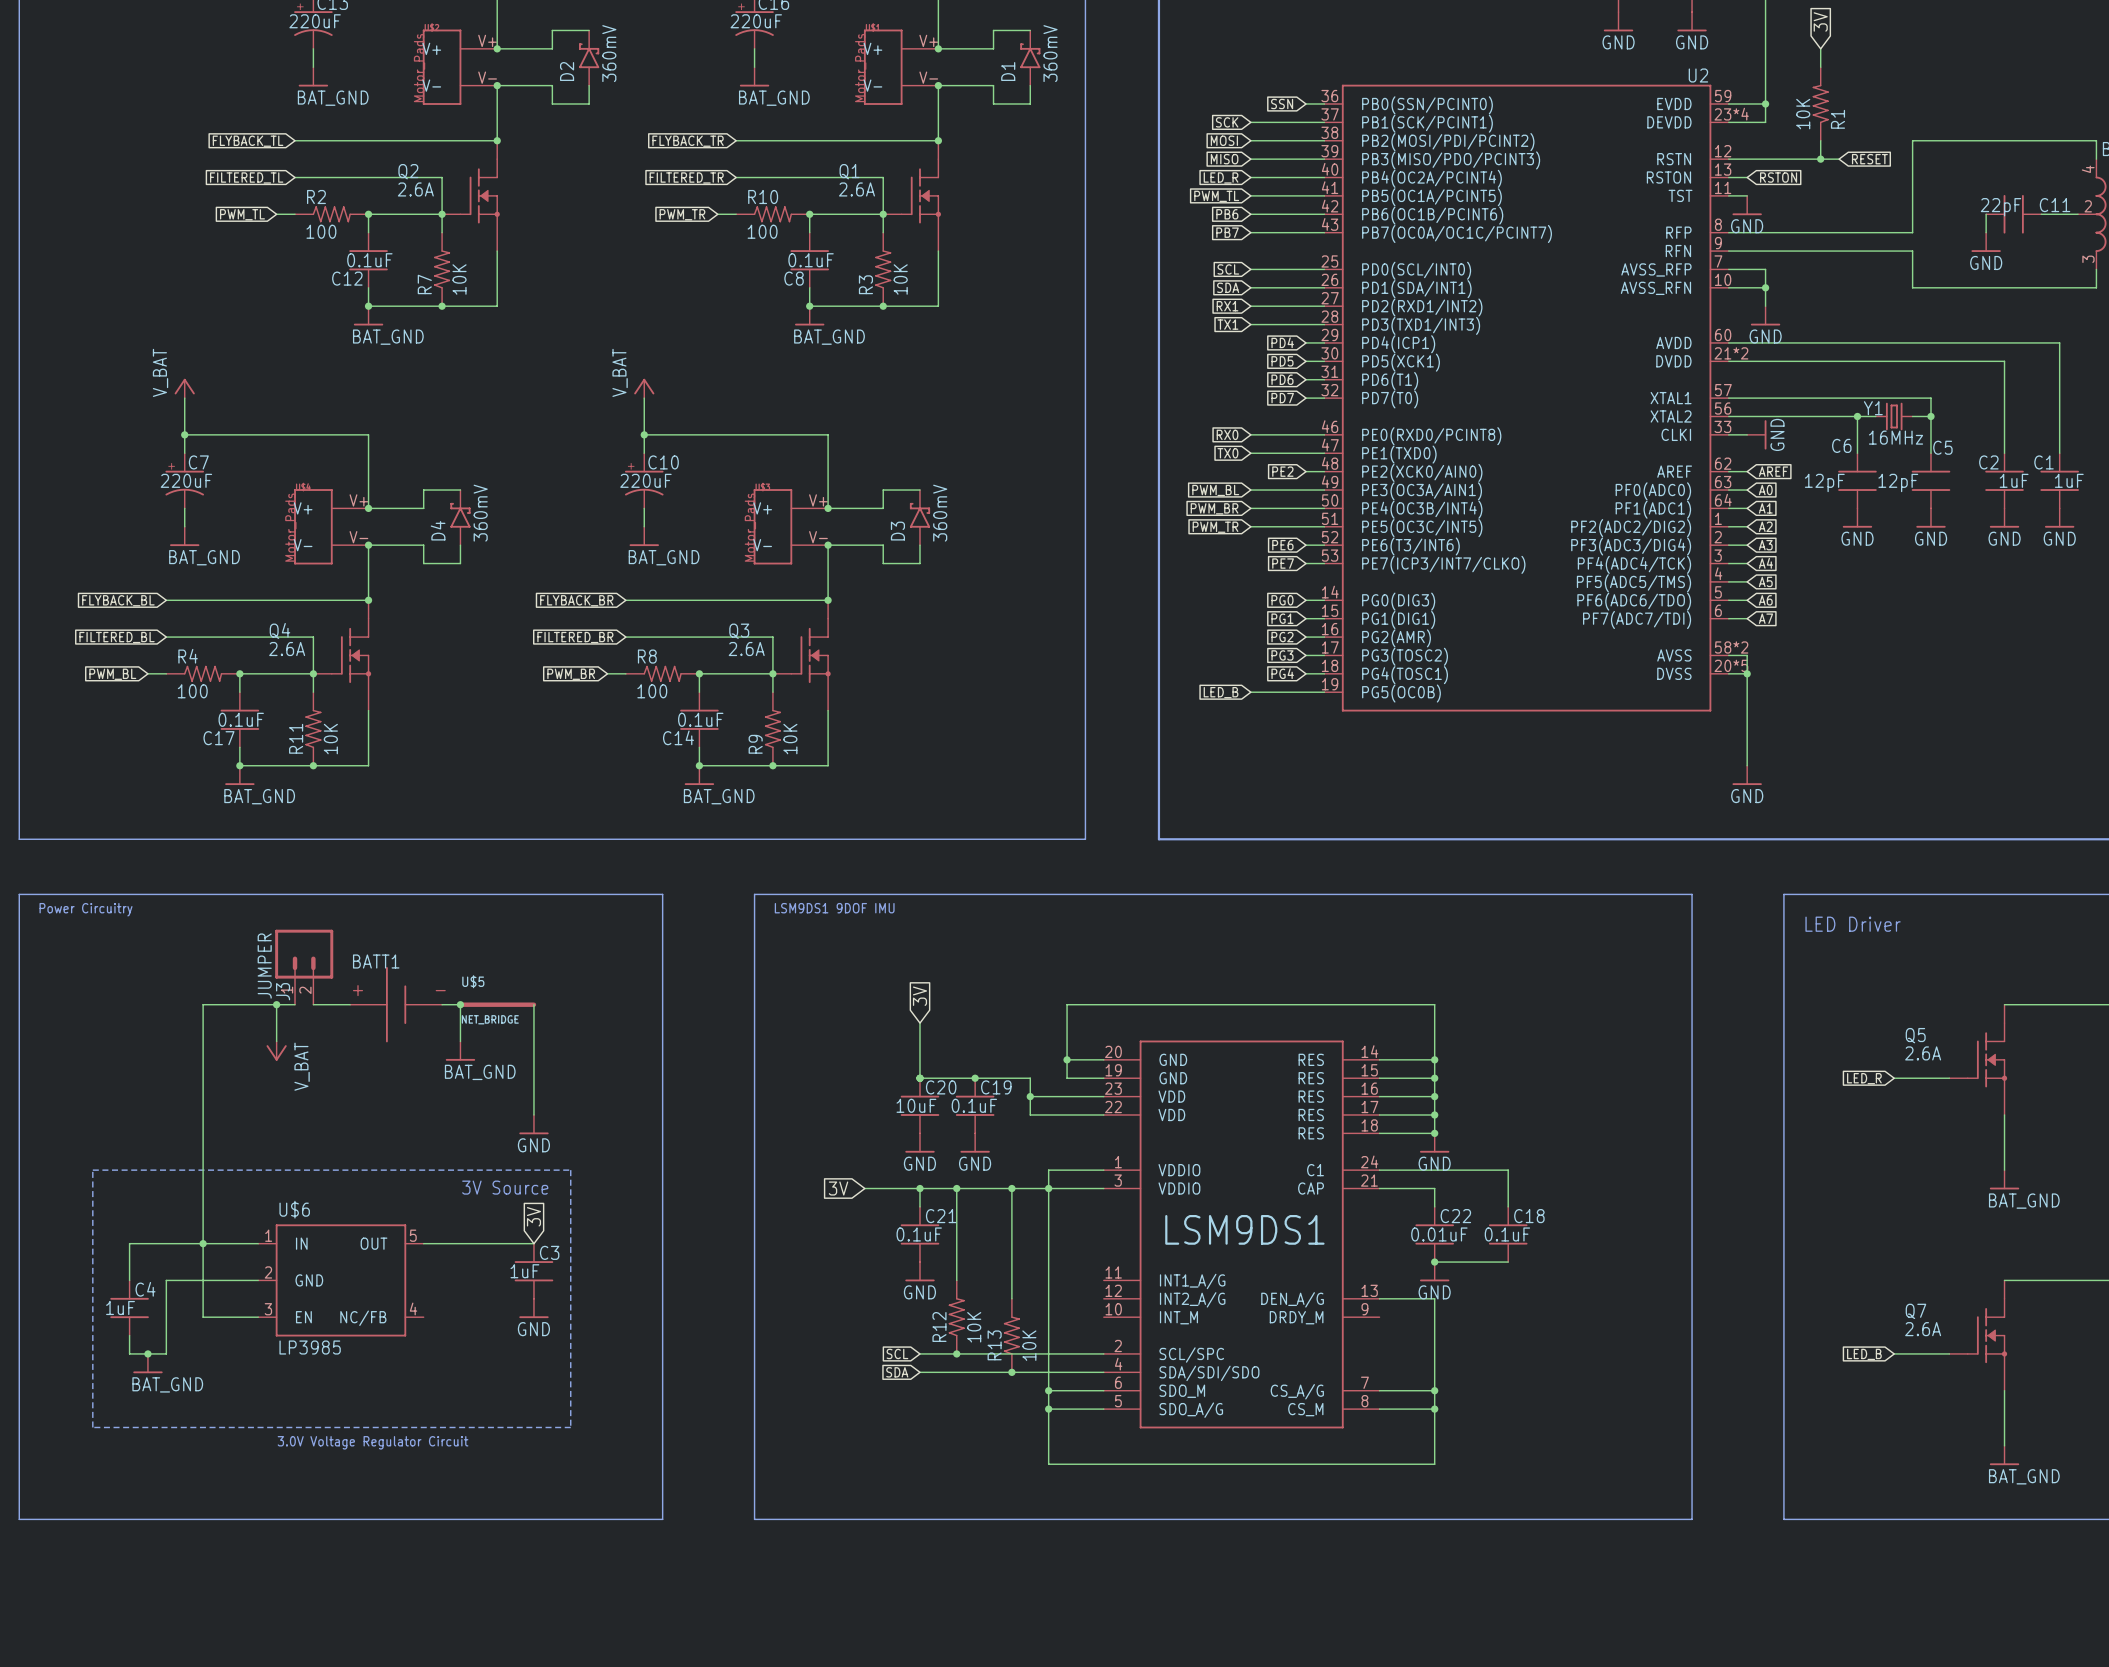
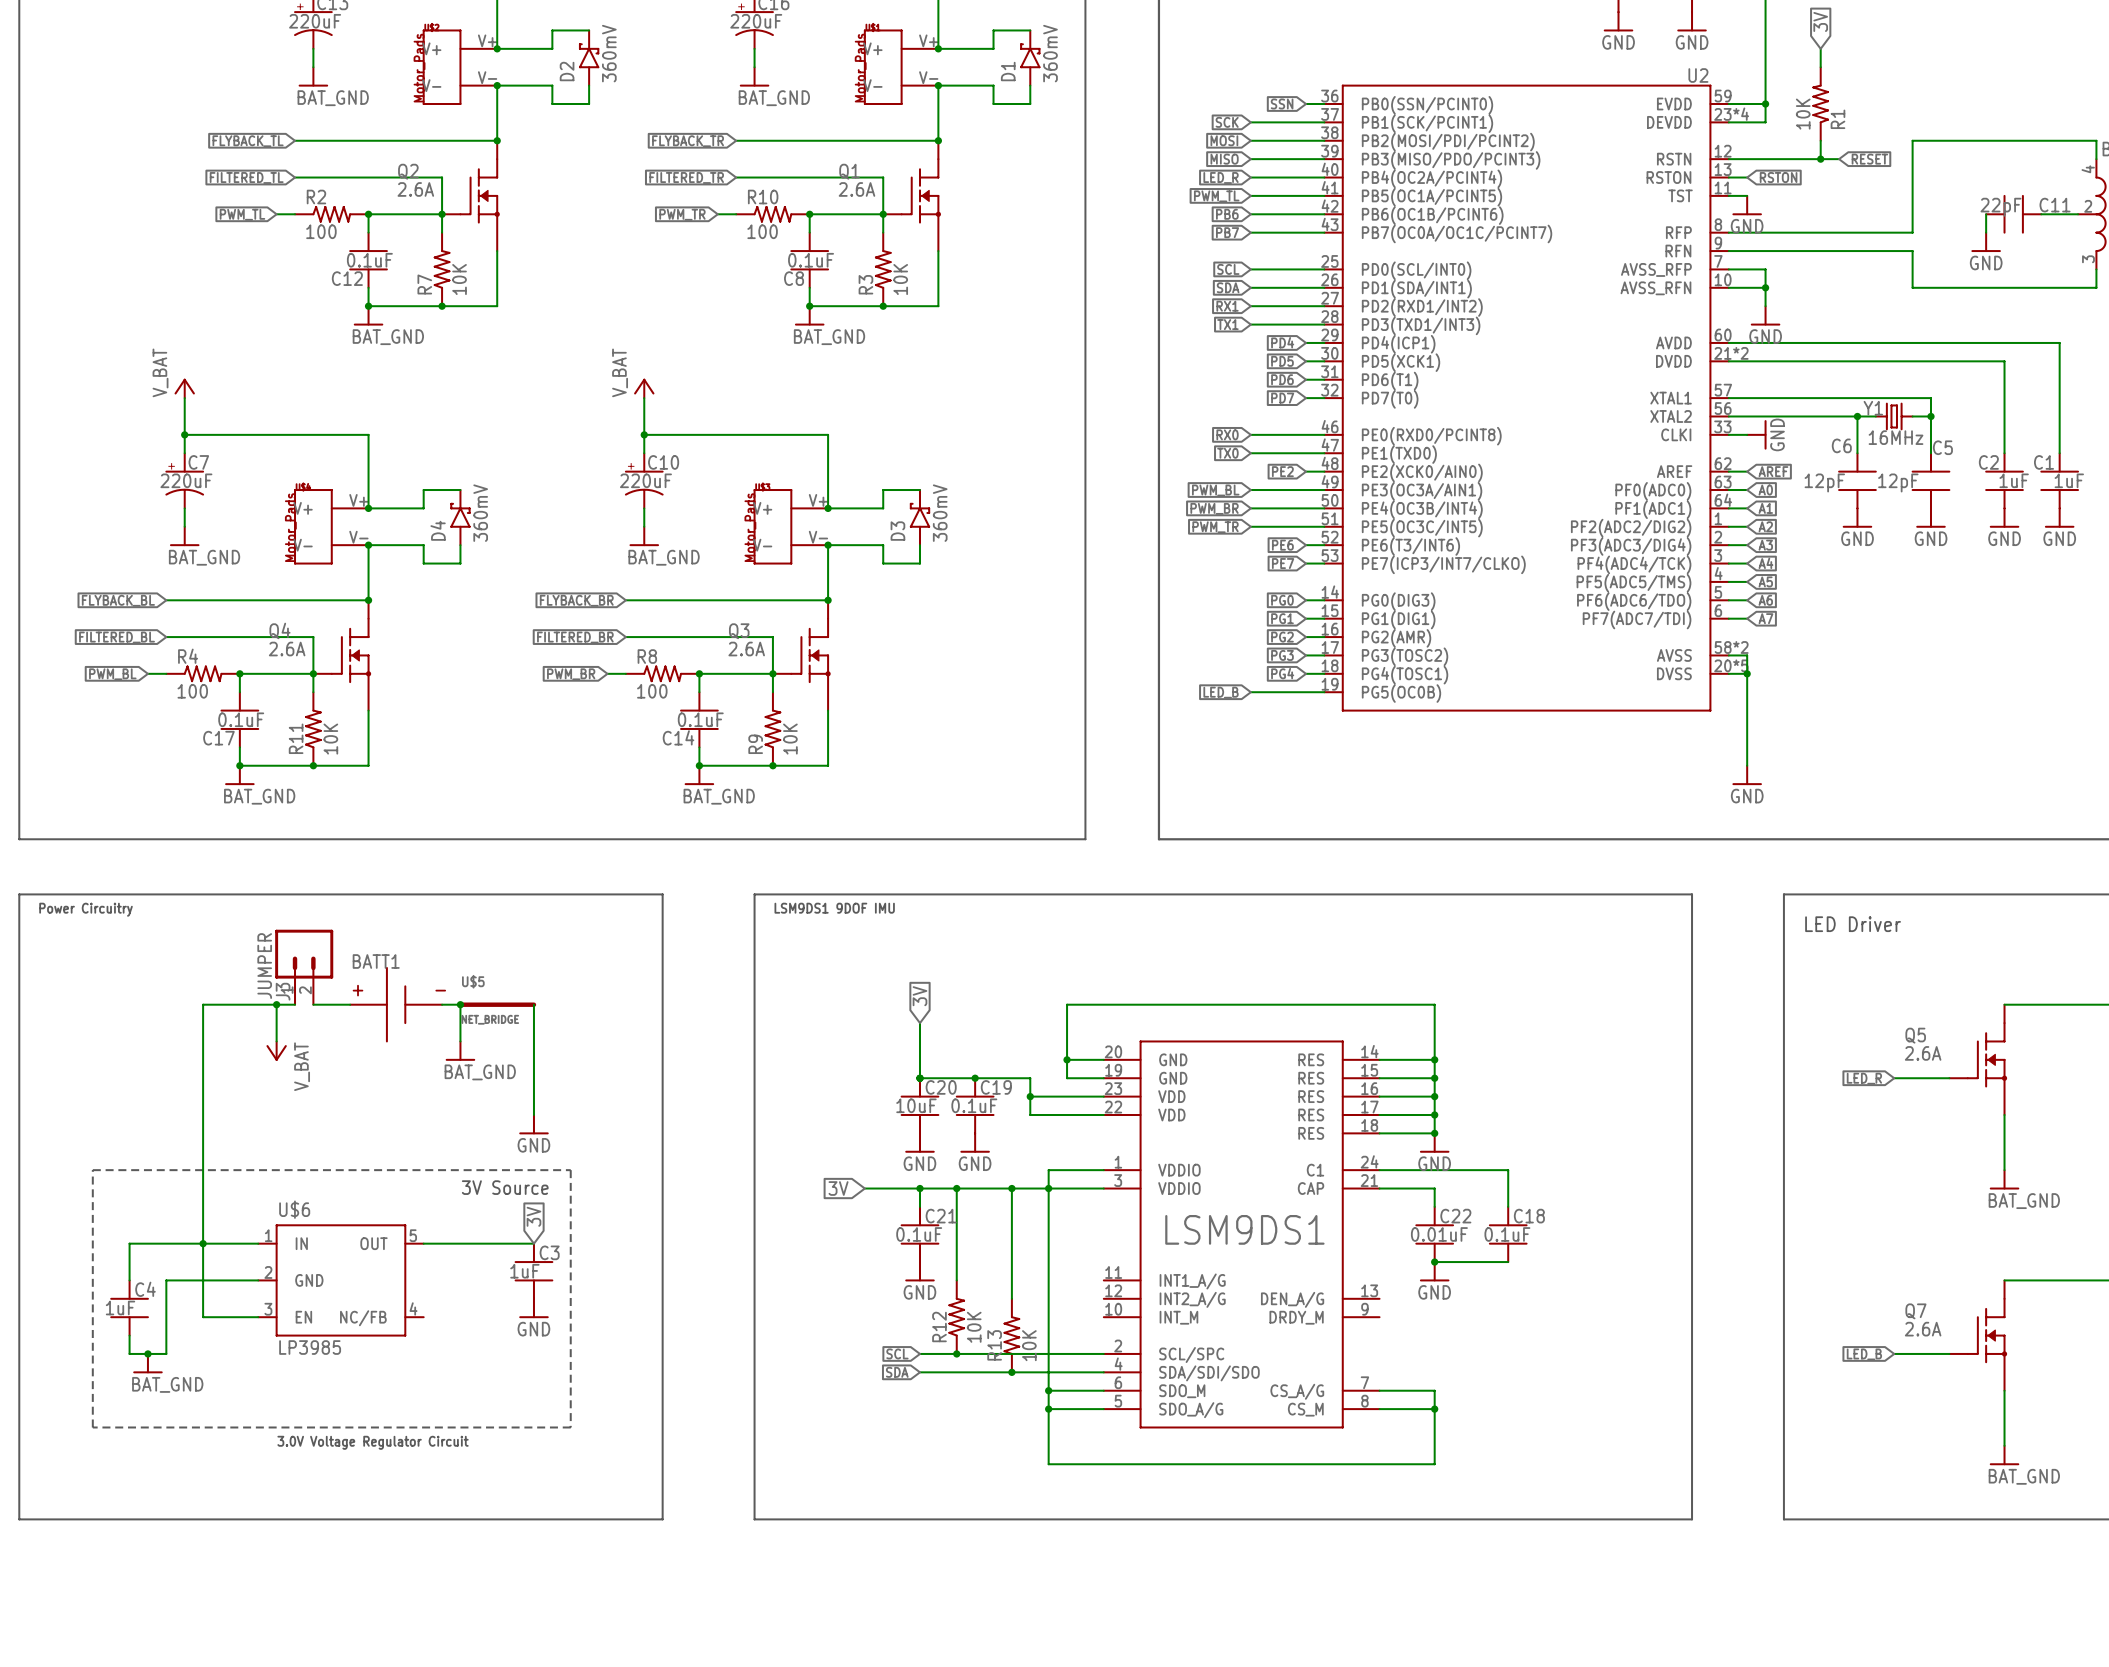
wire: (1379, 1298) (1434, 1298) (1434, 1390) -> none
junction: (1434, 1390) -> none

